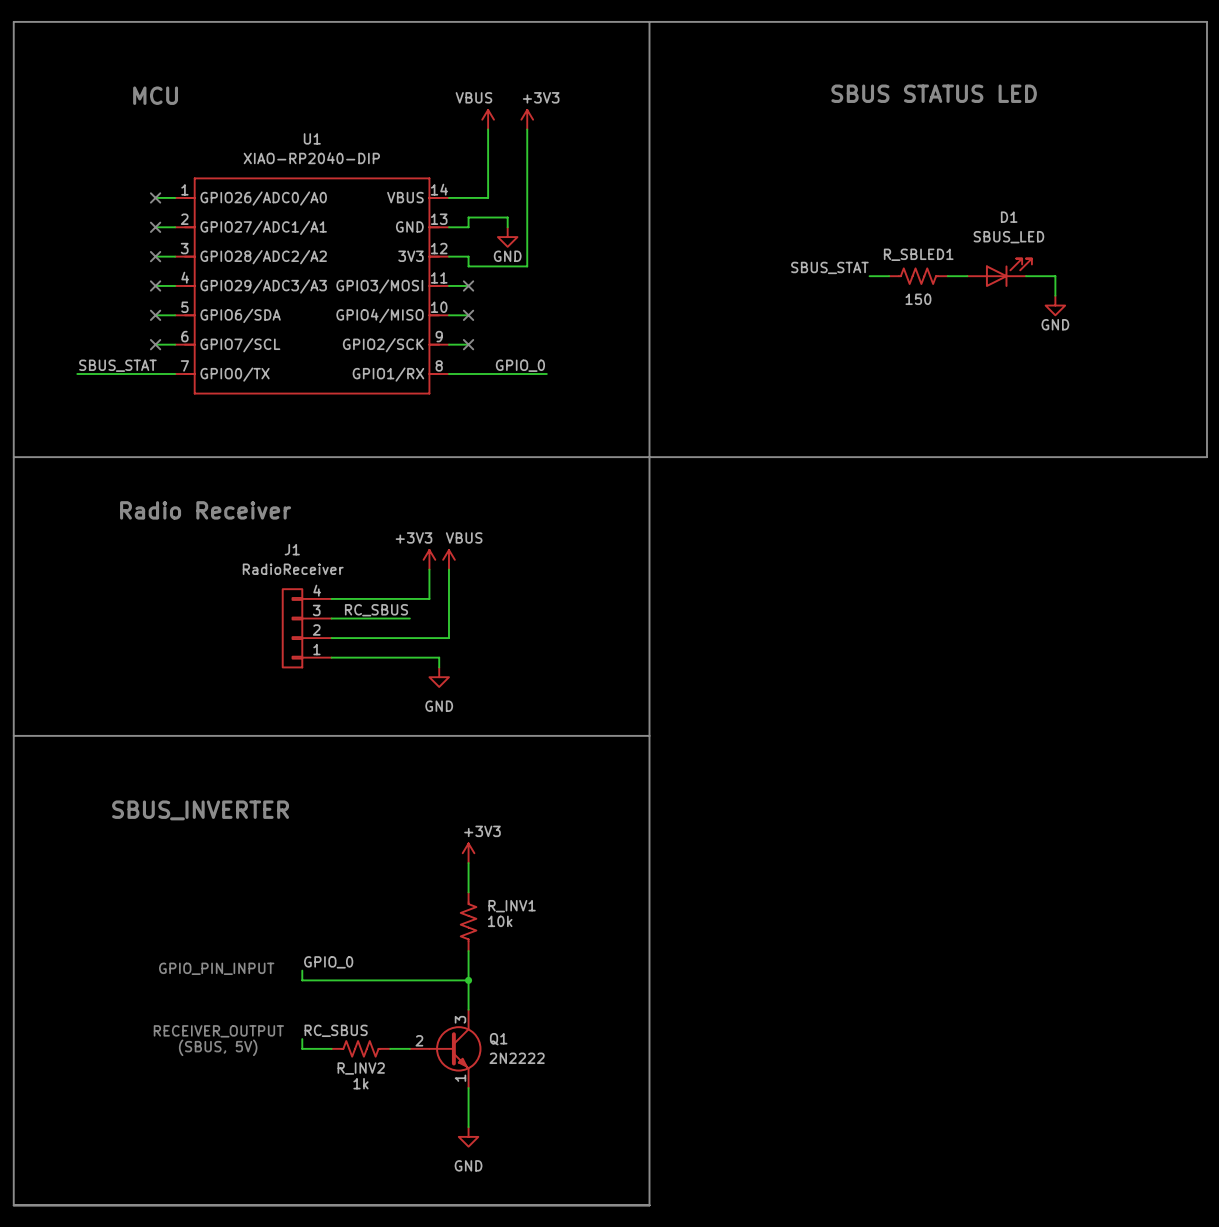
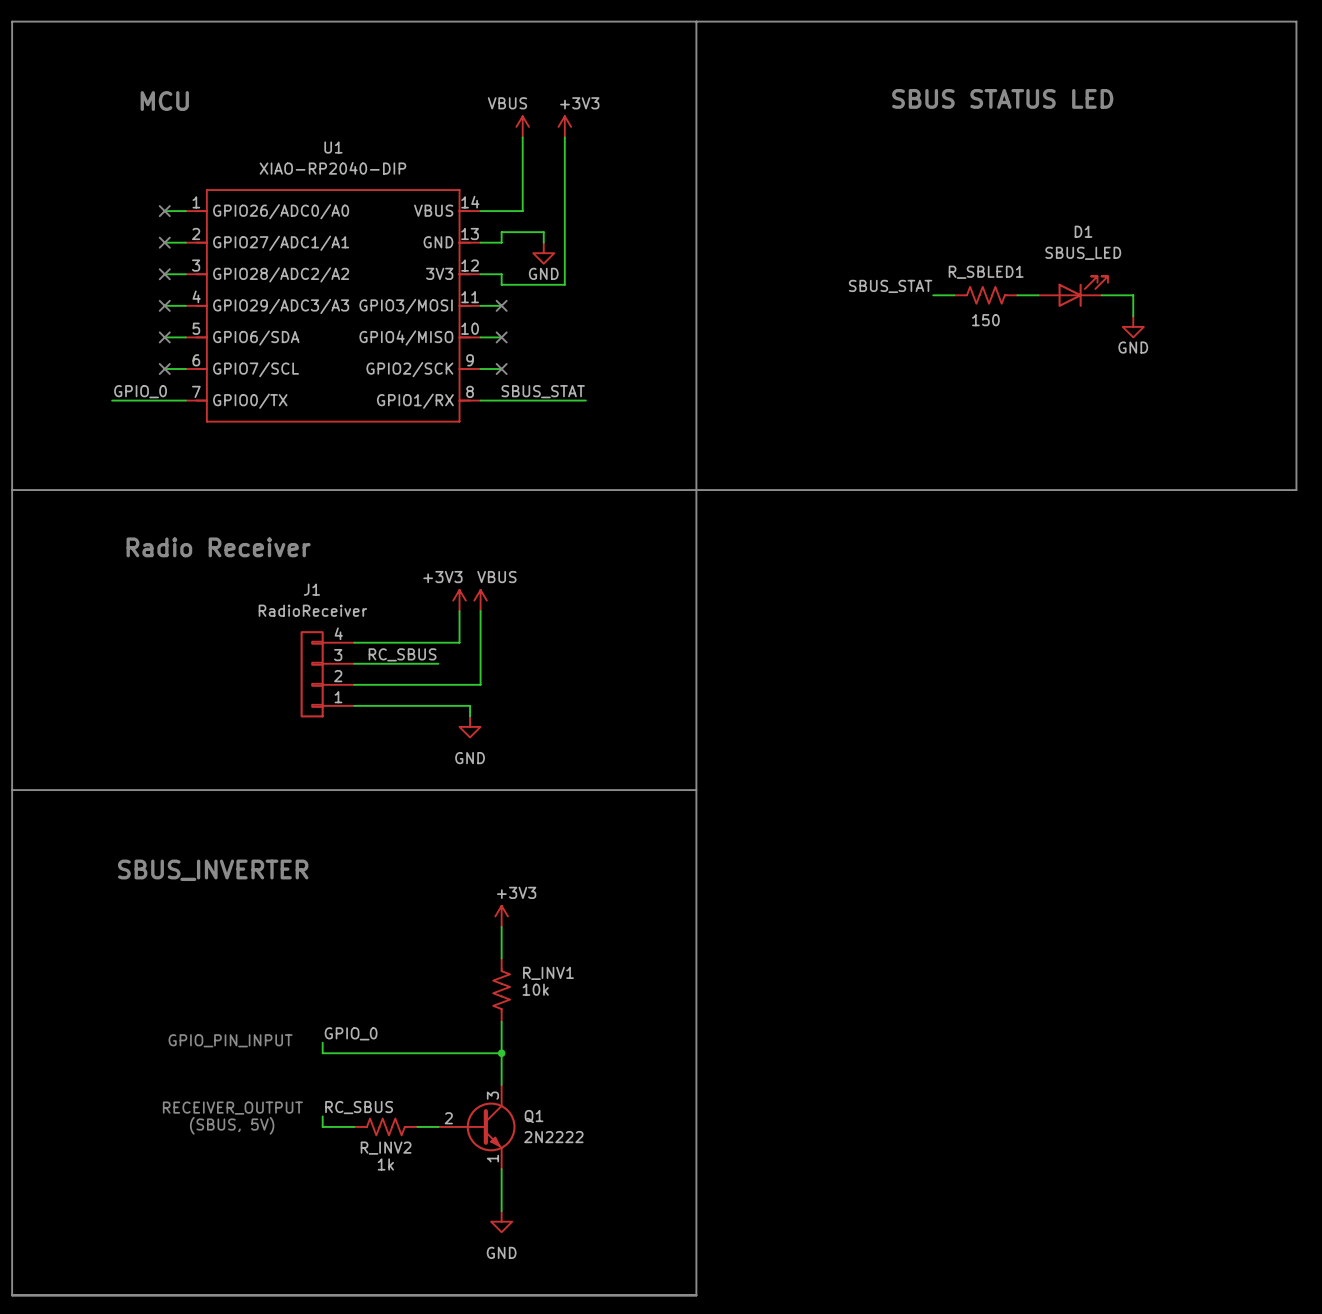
label: SBUS_STAT (117, 365) -> none
label: none -> GPIO_0 (140, 391)
label: GPIO_0 (520, 365) -> SBUS_STAT (543, 391)
wire: (77, 374) (106, 374) -> none

